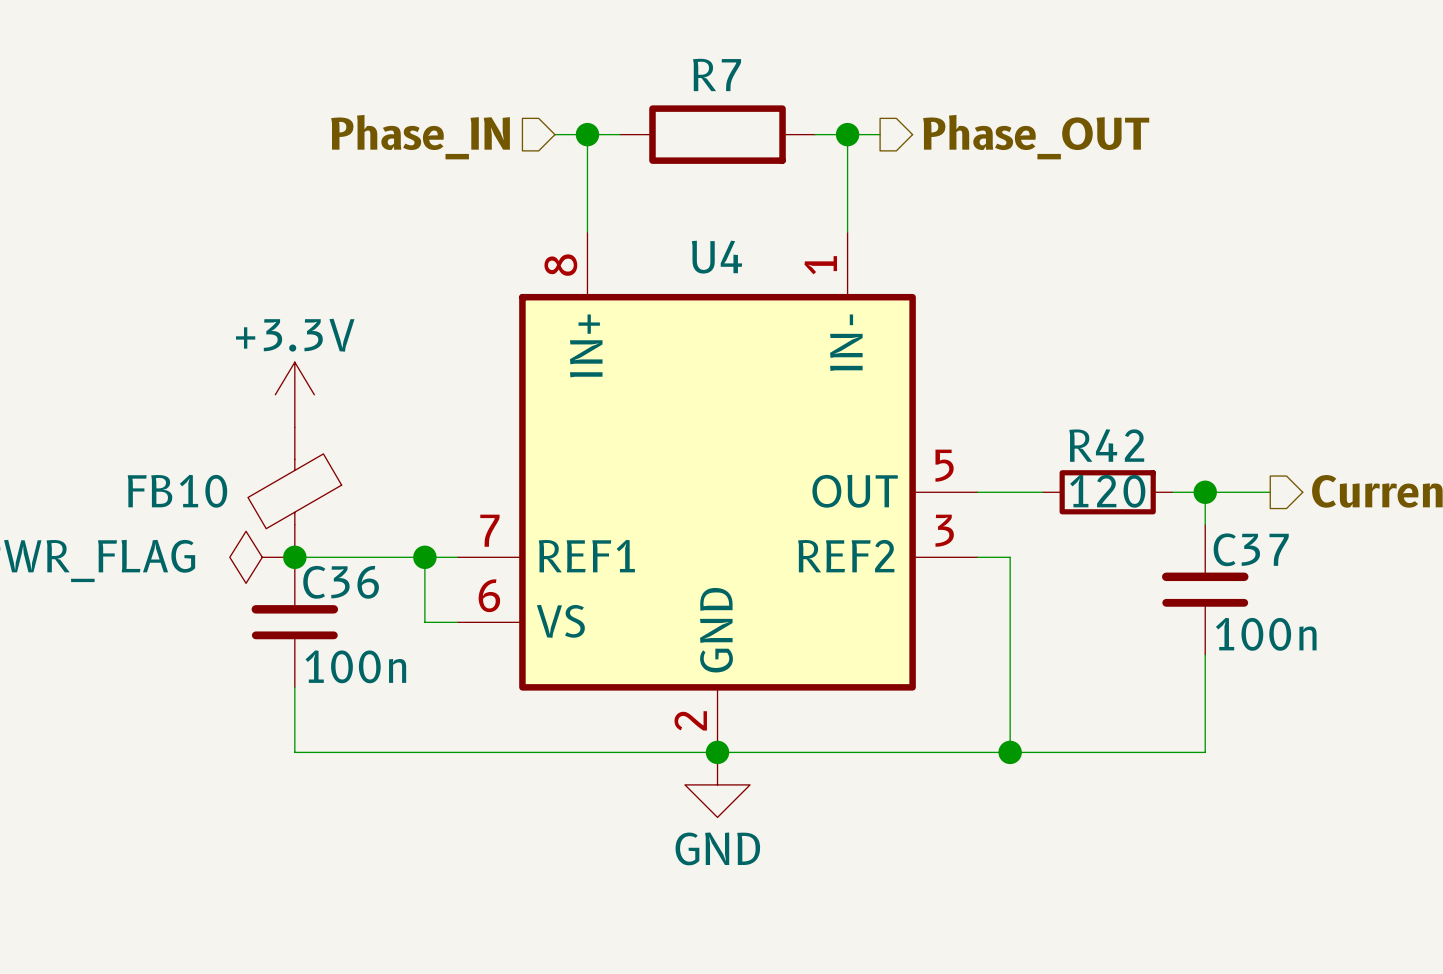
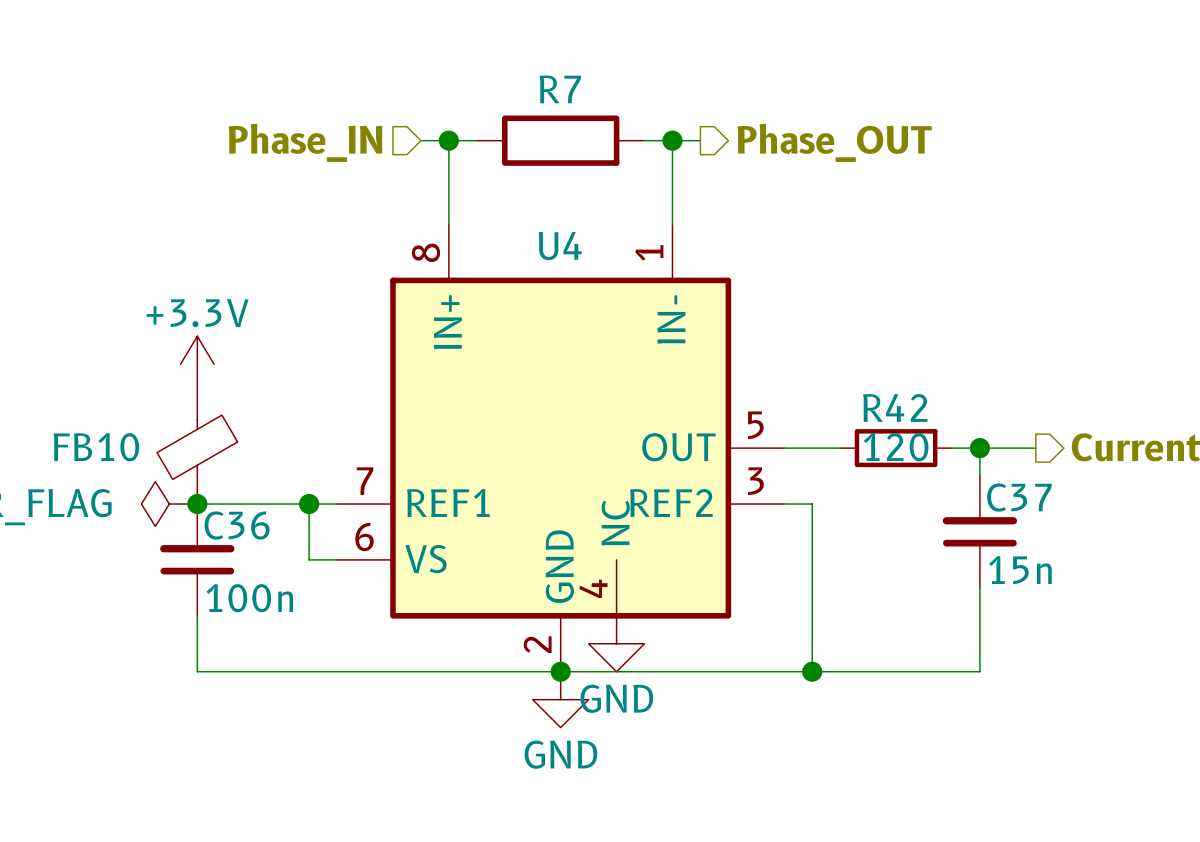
U4 symbol: [457, 232, 978, 753] -> [337, 224, 785, 672]
C37 value: 100n (1266, 634) -> 15n (1020, 570)
power symbol: none -> GND (616, 643)

